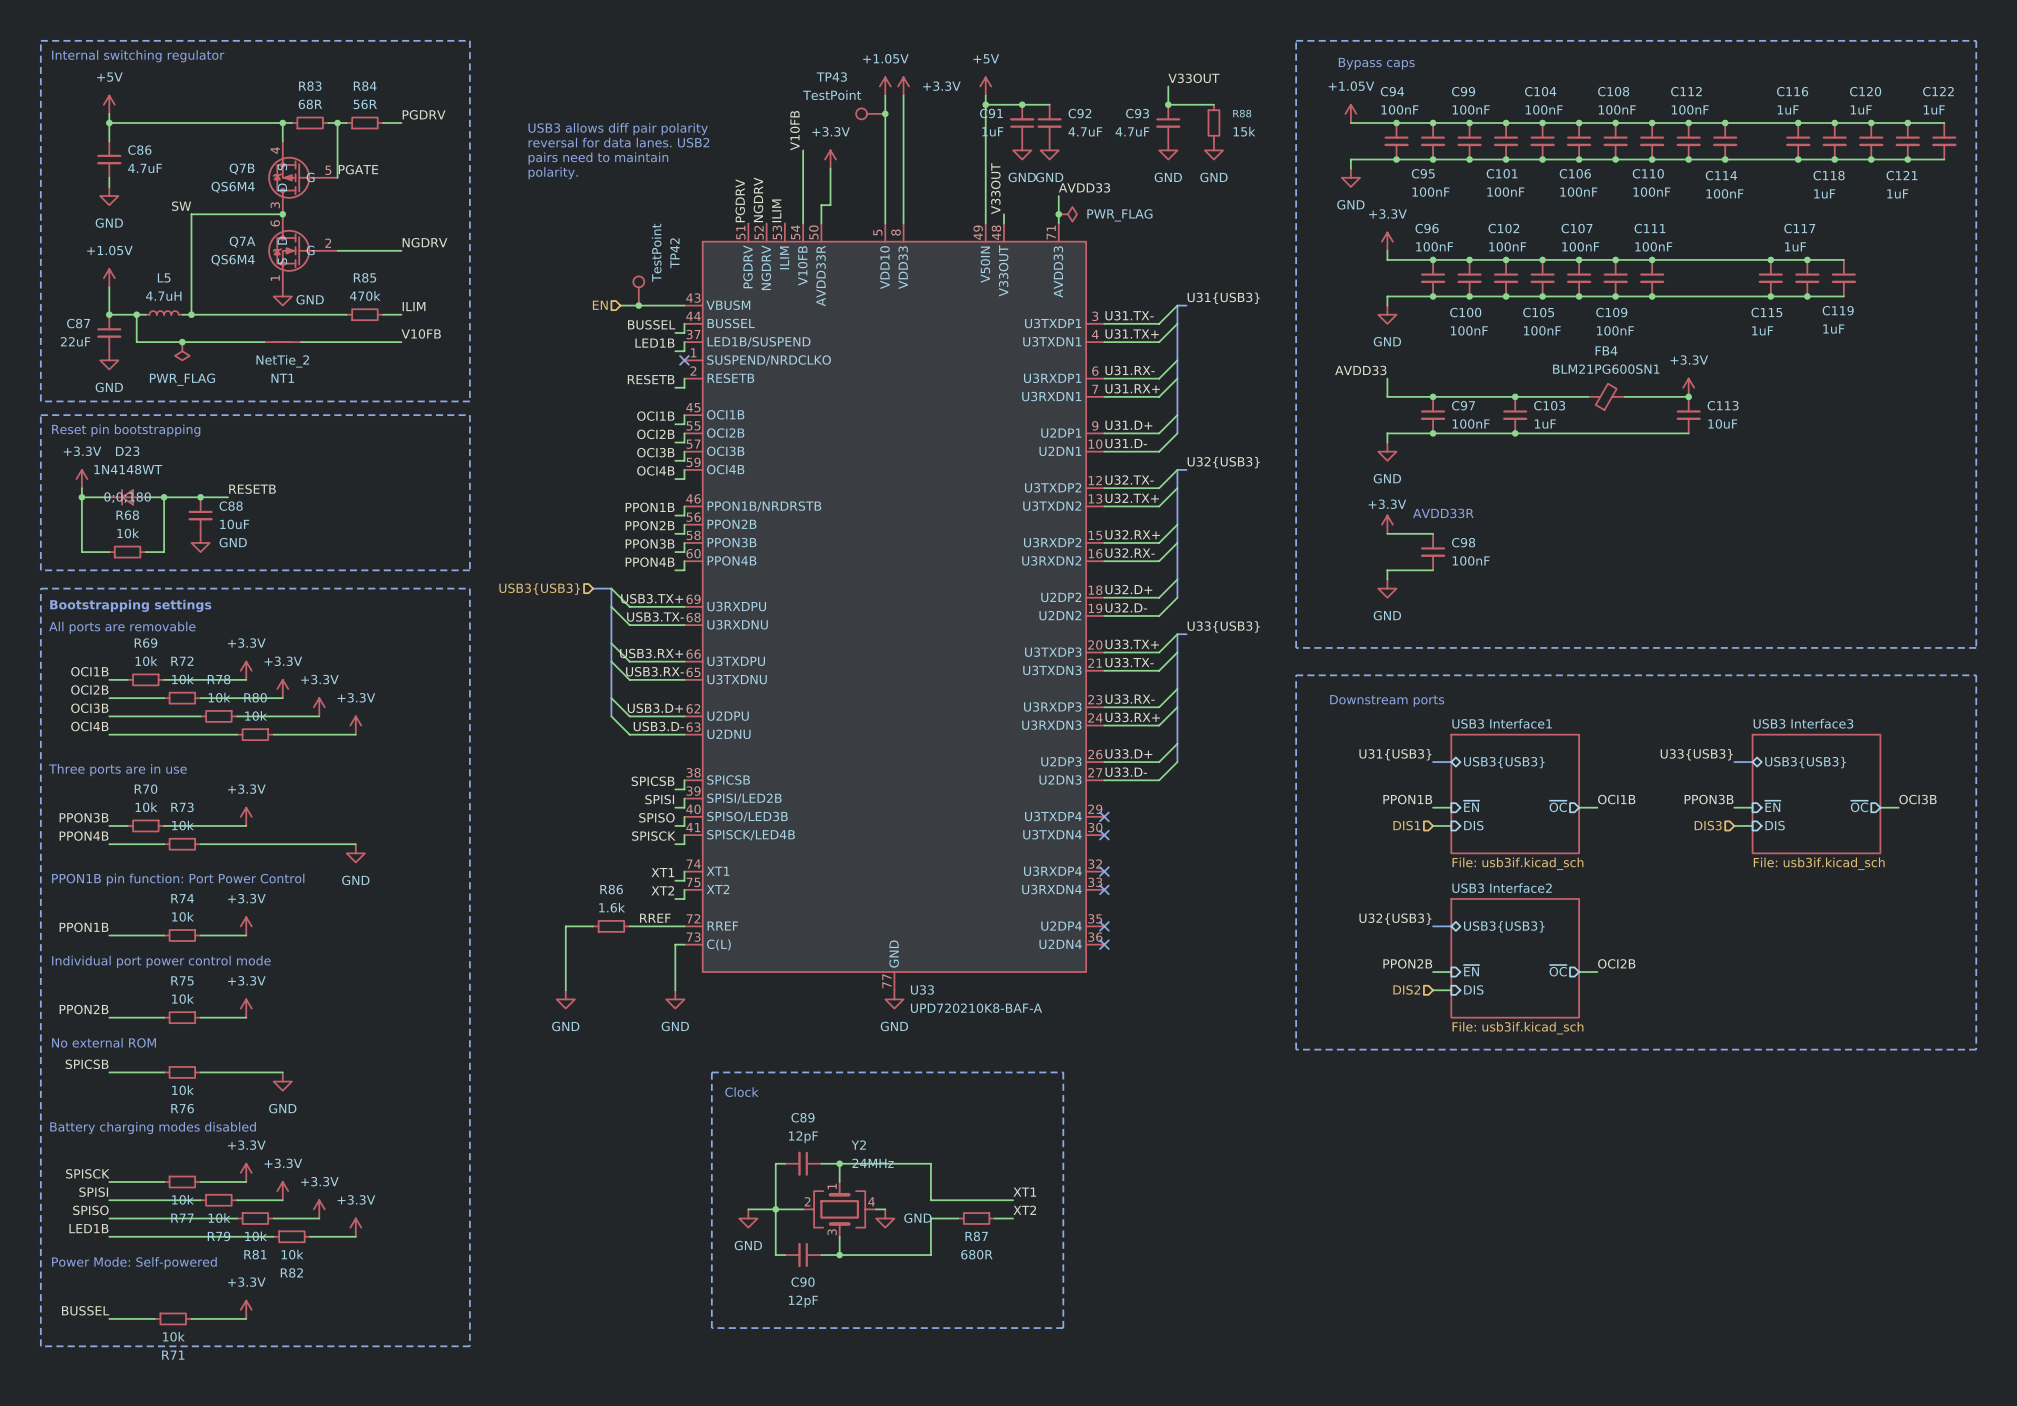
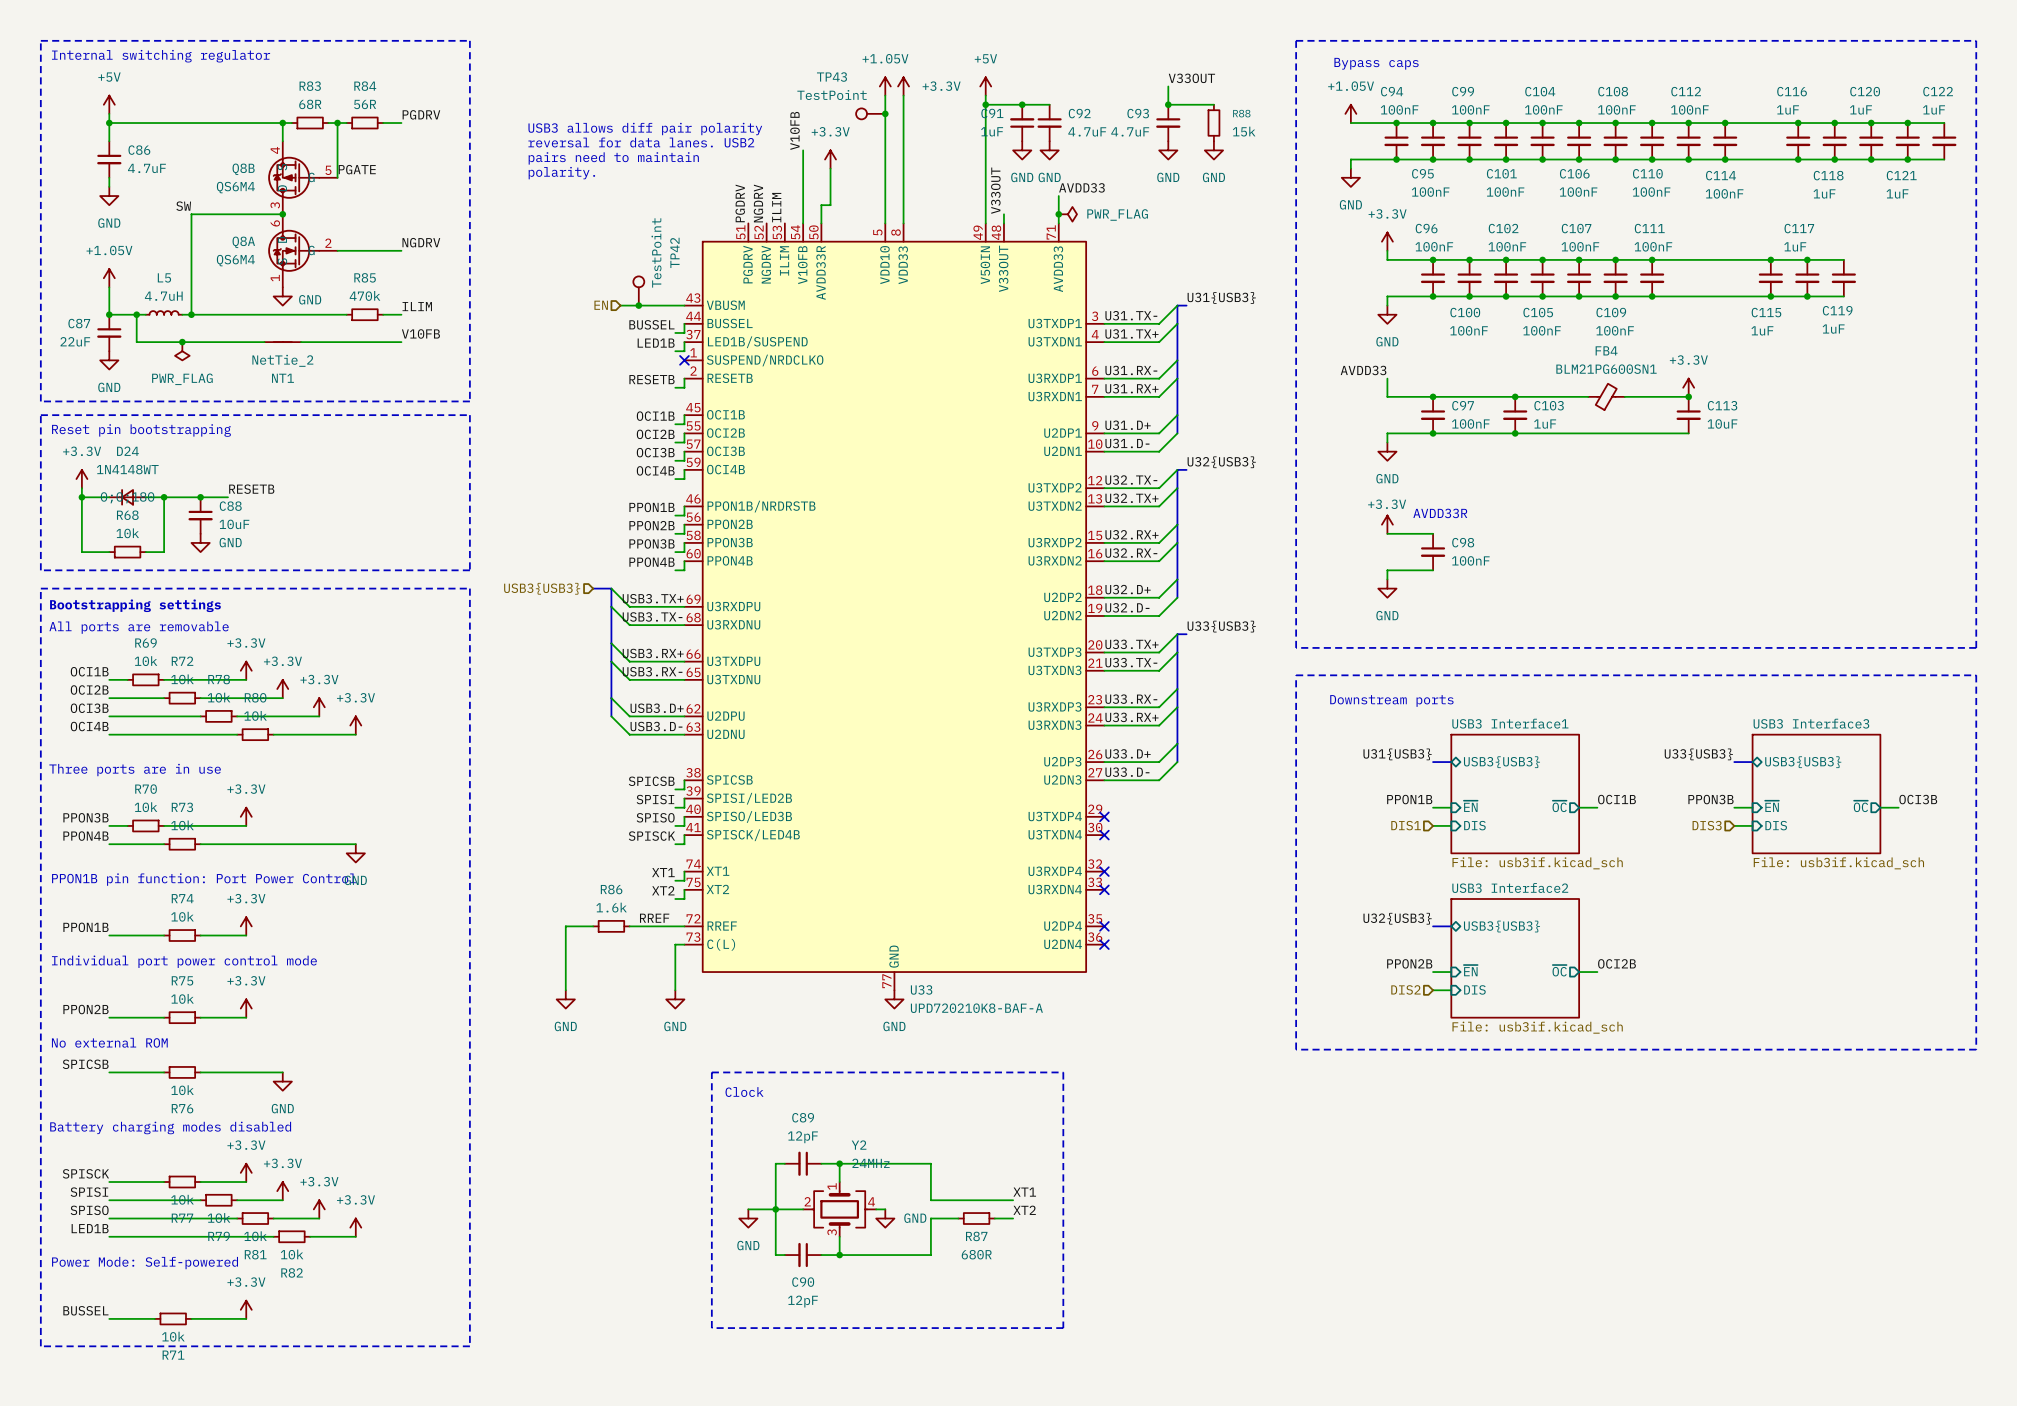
Q7B name: Q7B (242, 169) -> Q8B (243, 169)
Q7A name: Q7A (242, 242) -> Q8A (243, 242)
D23 name: D23 (127, 451) -> D24 (127, 451)

